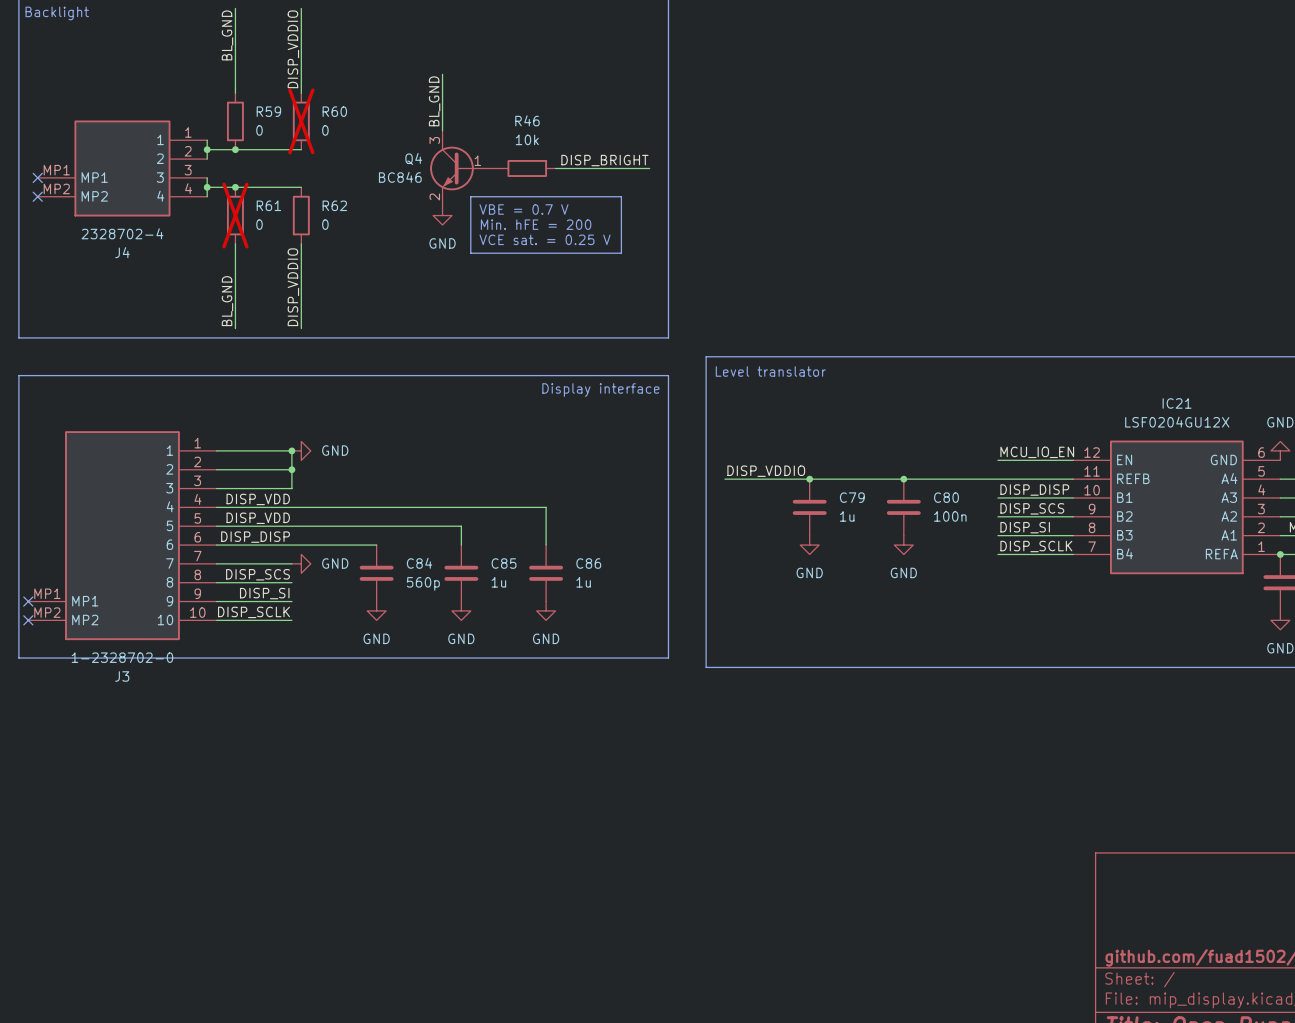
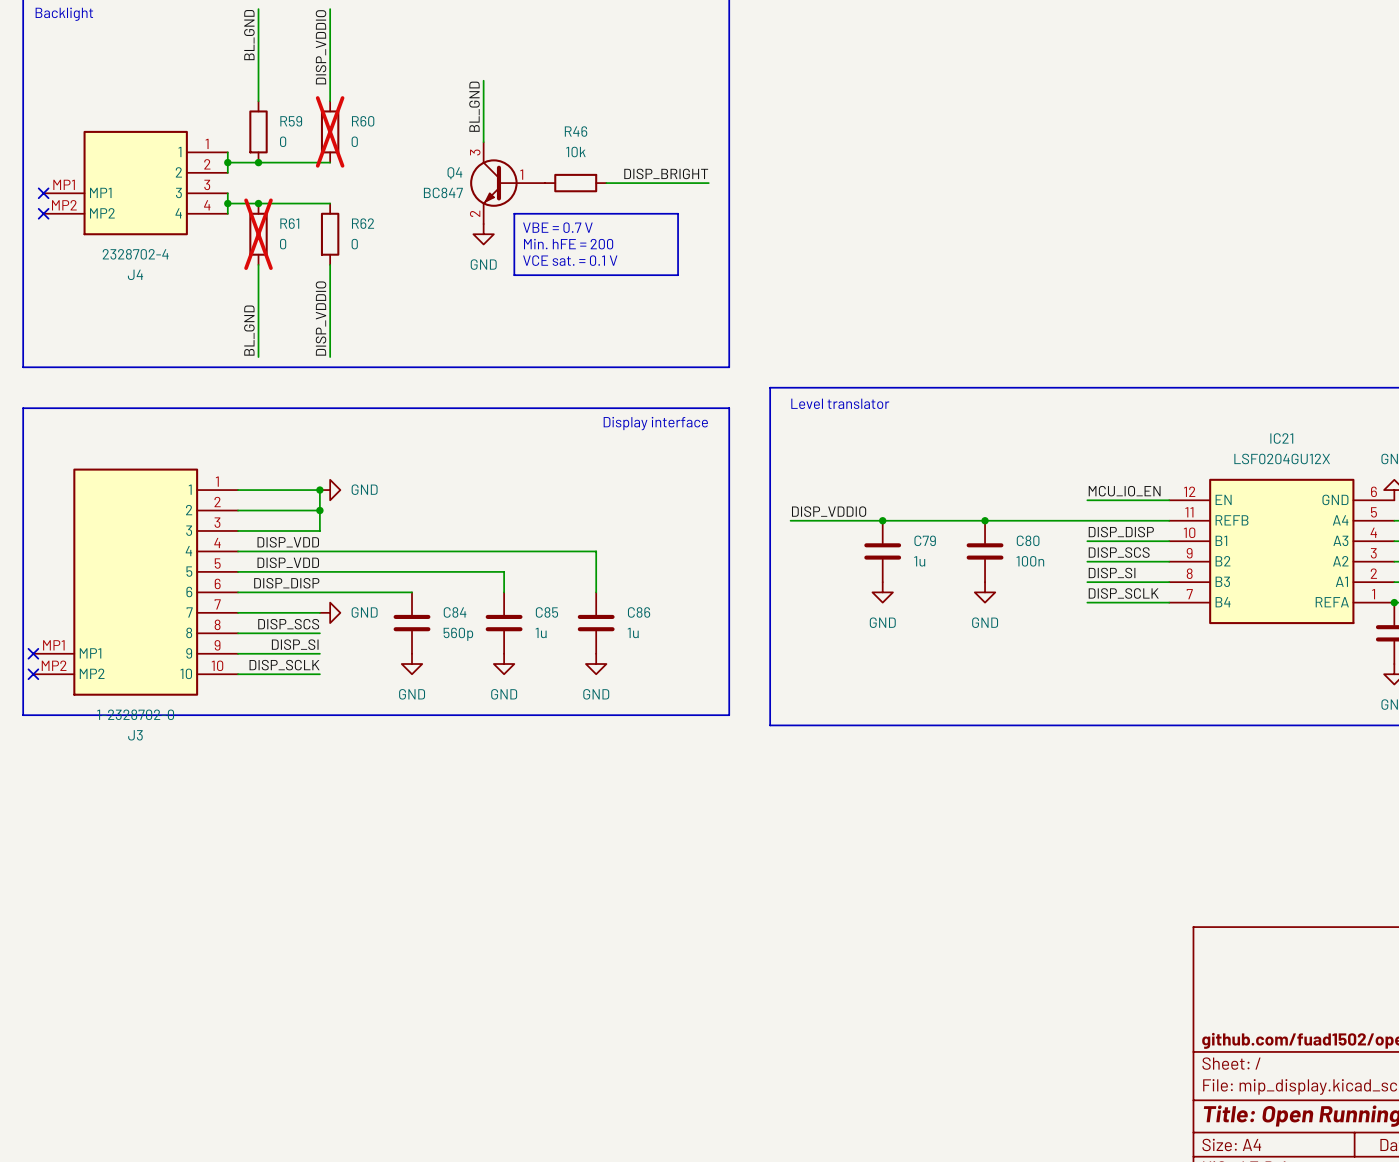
Q4 value: BC846 (400, 177) -> BC847 (443, 192)
text: VCE sat. = 0.25 V (545, 239) -> VCE sat. = 0.1 V (570, 260)

